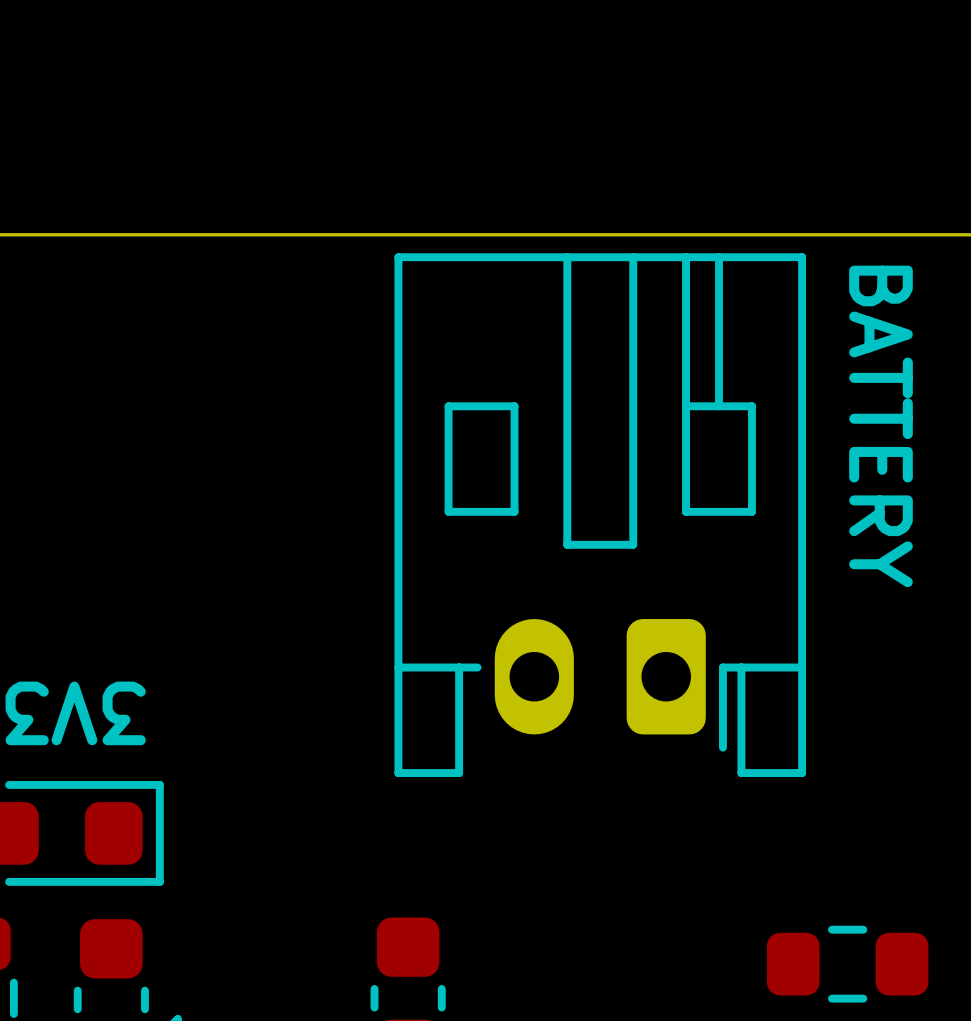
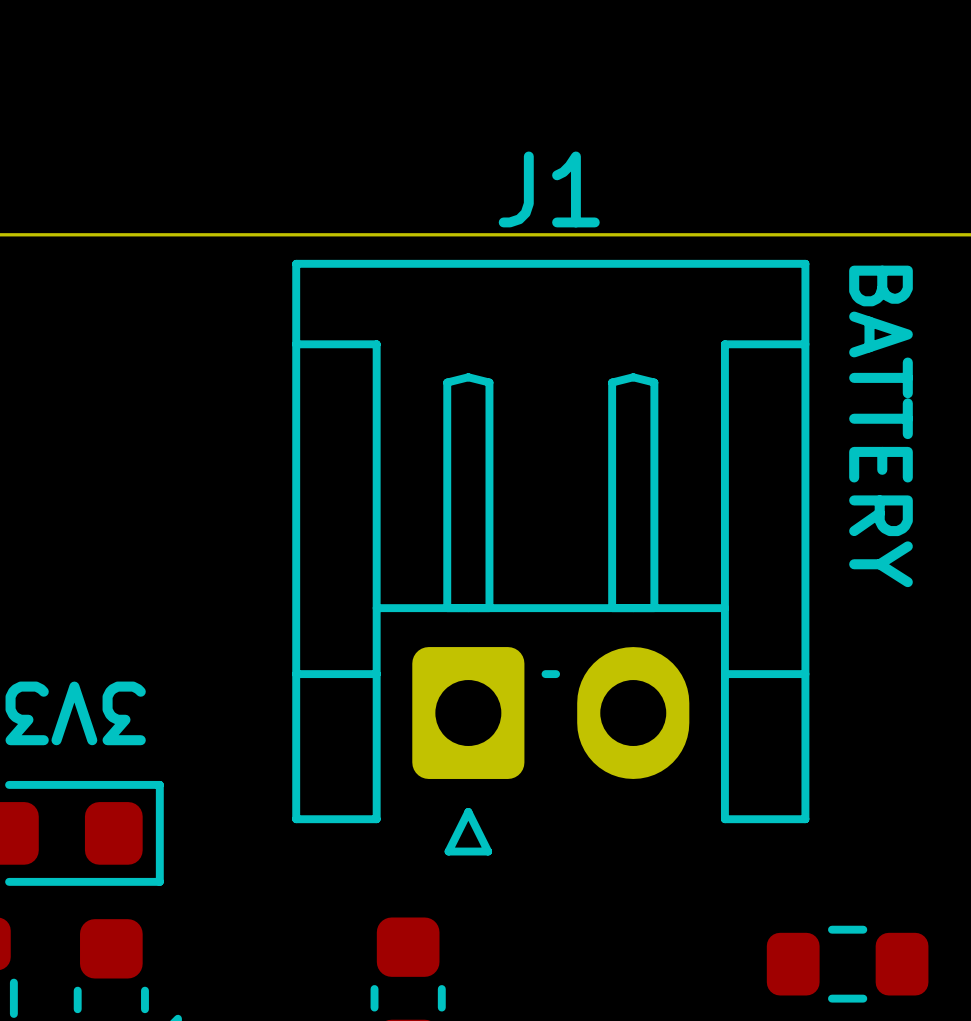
part: (600, 515) -> none
J1: none -> (550, 557)

